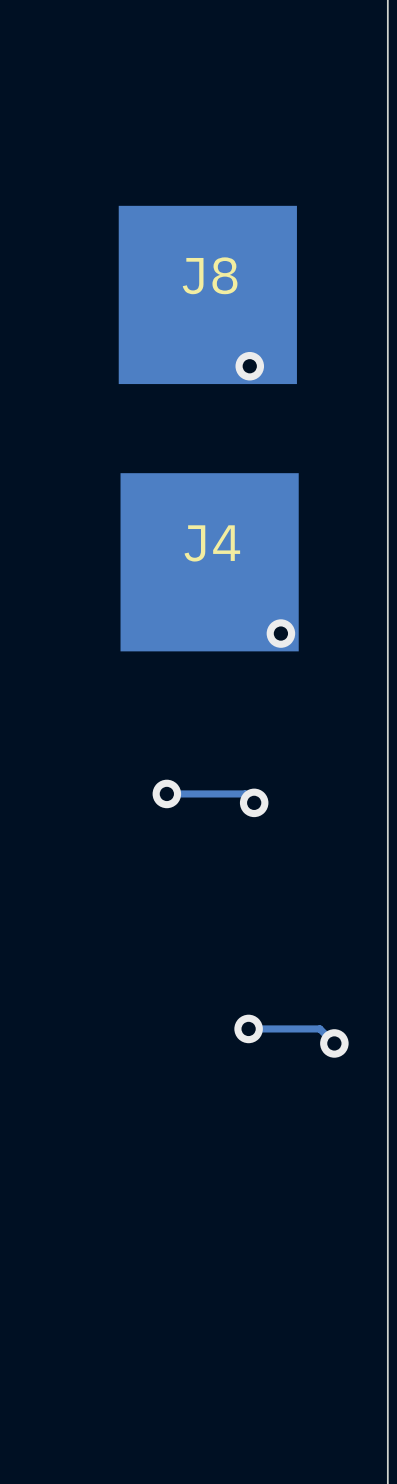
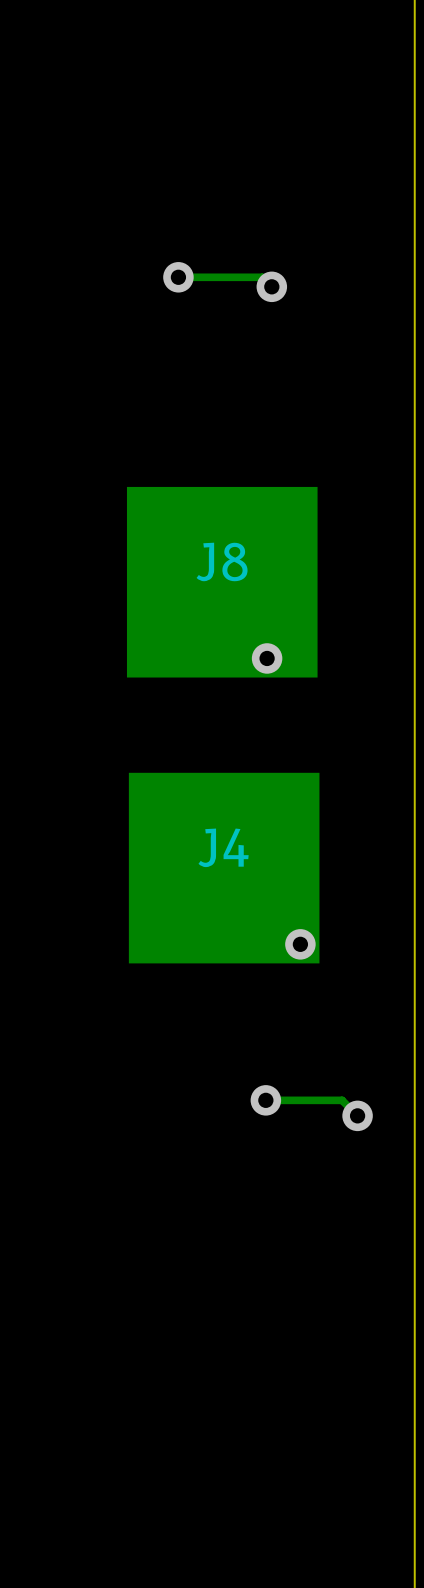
via: none -> (178, 277)
via: none -> (271, 286)
J8 position: (207, 294) -> (222, 582)
via: (249, 366) -> none
J4 position: (209, 562) -> (224, 868)
via position: (280, 633) -> (267, 658)
track: (166, 793) (245, 793) (254, 802) -> (178, 277) (262, 277) (271, 286)
via: (166, 793) -> none
via: (254, 802) -> none
via: none -> (300, 944)

